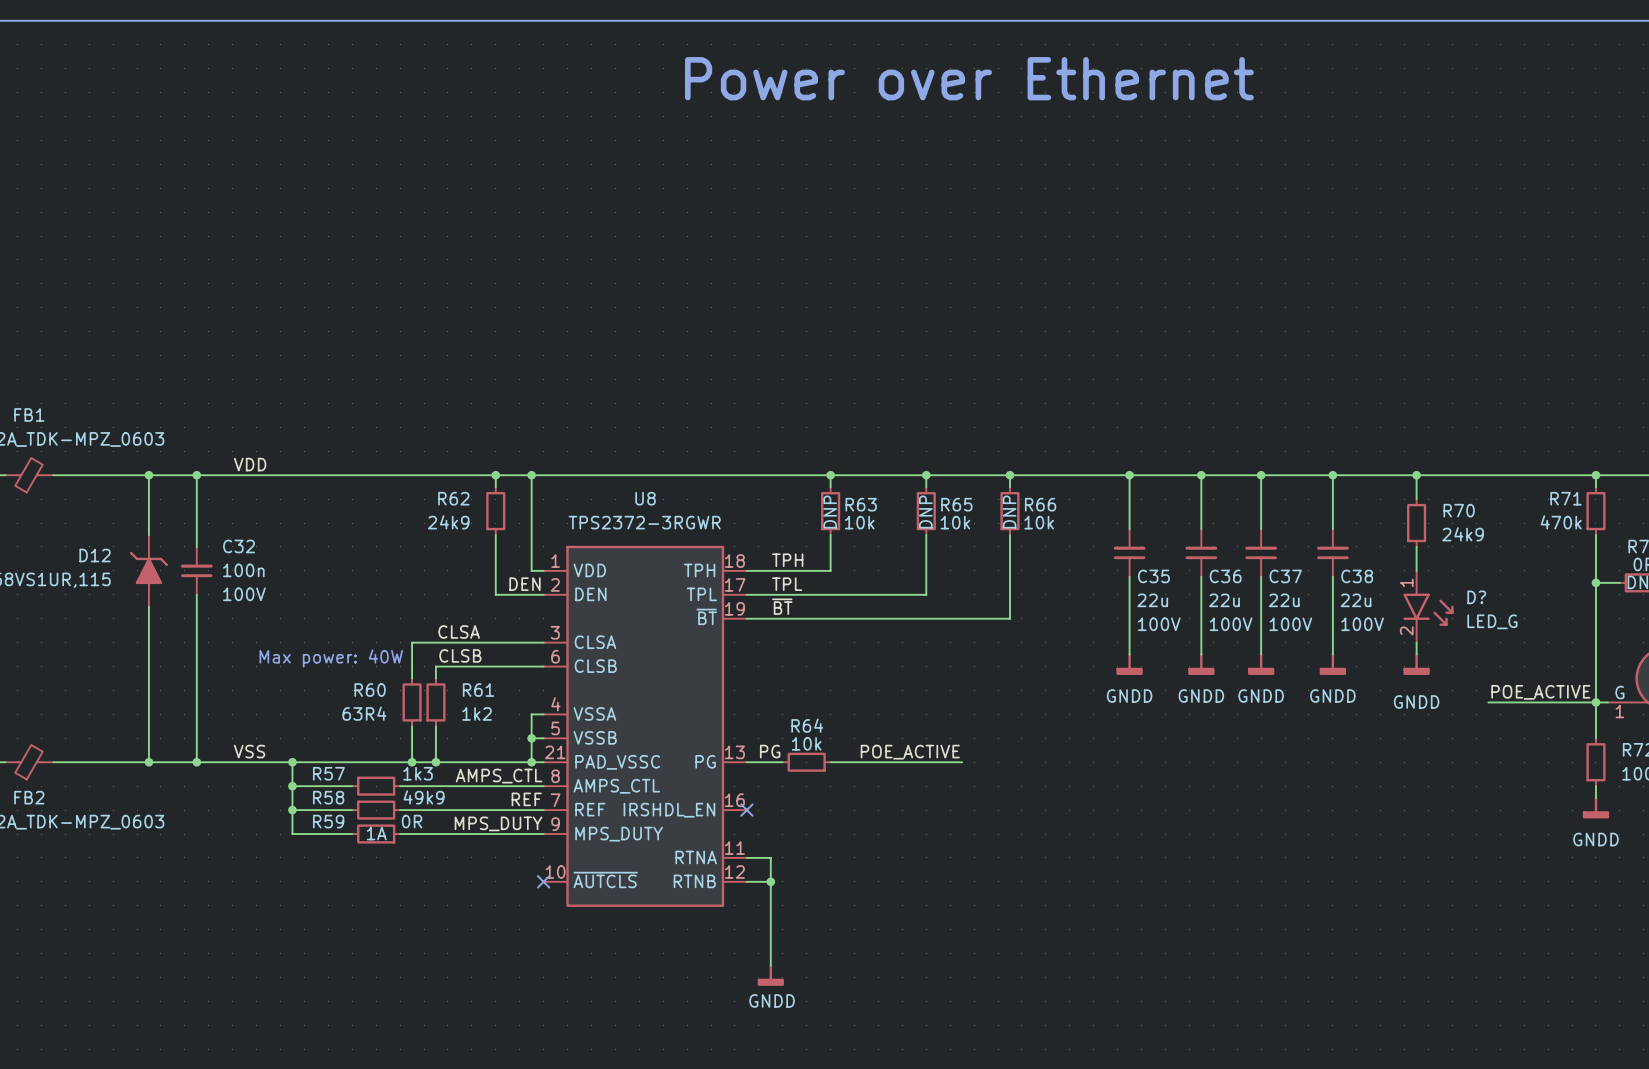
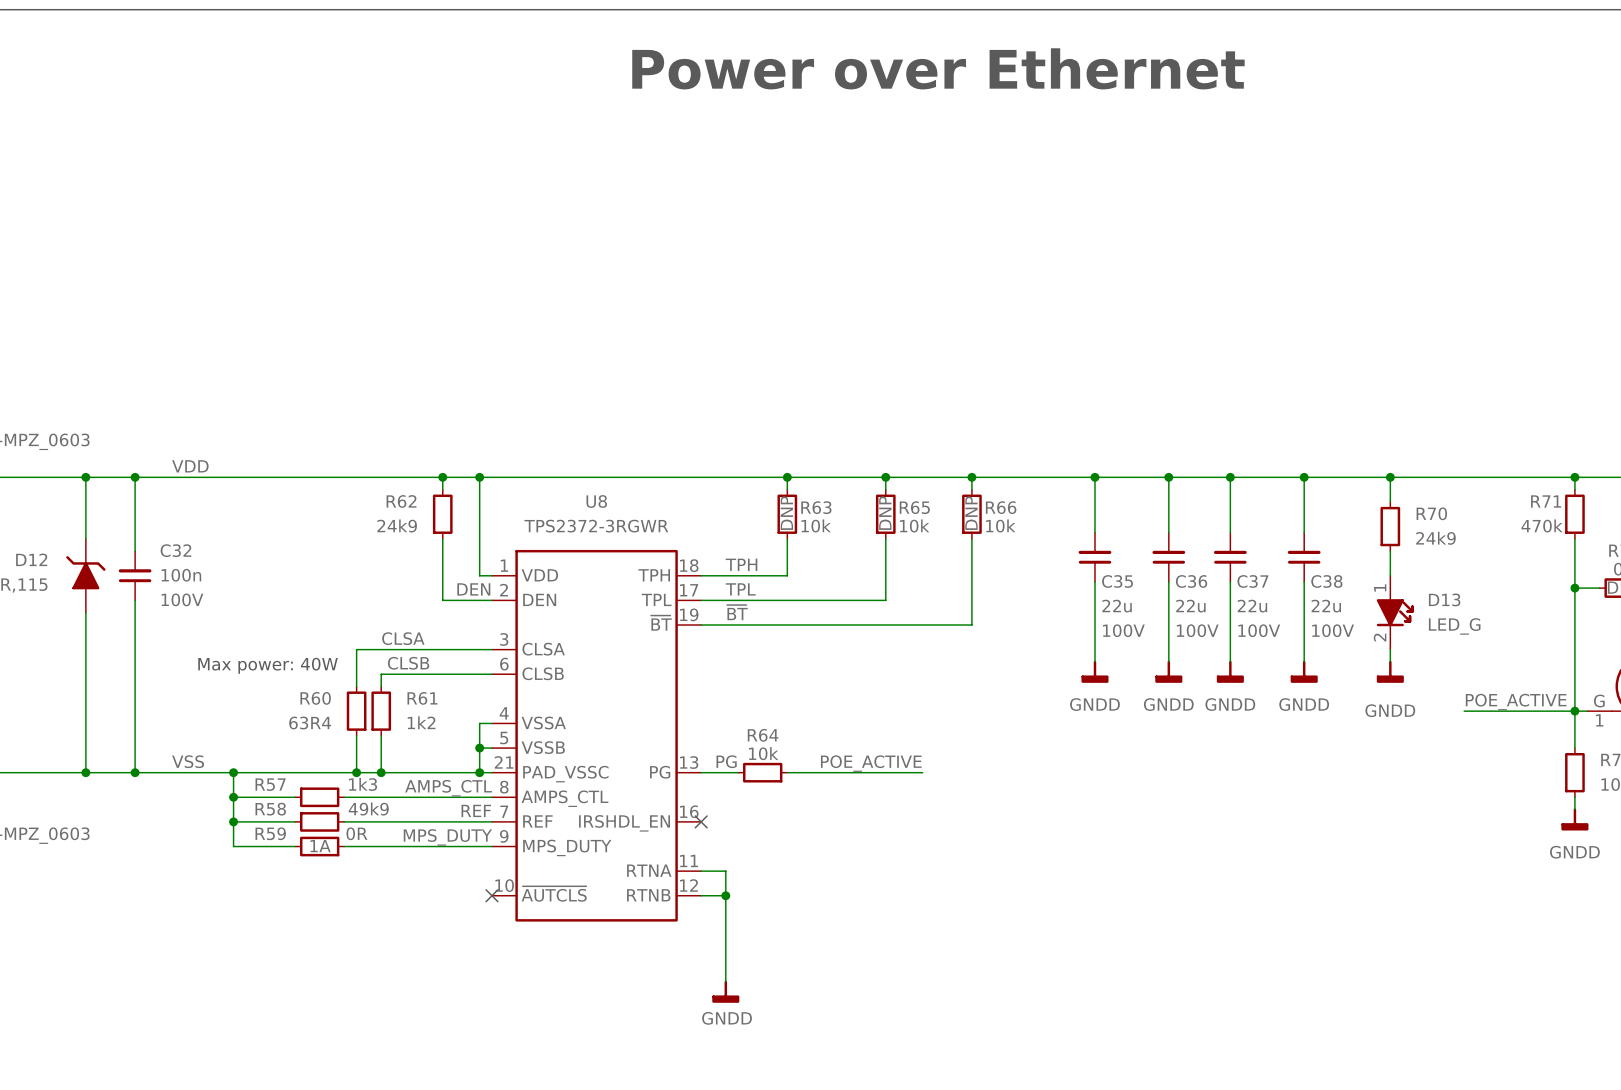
D13: none -> LED_G (1395, 612)
D?: LED_G (1428, 606) -> none

